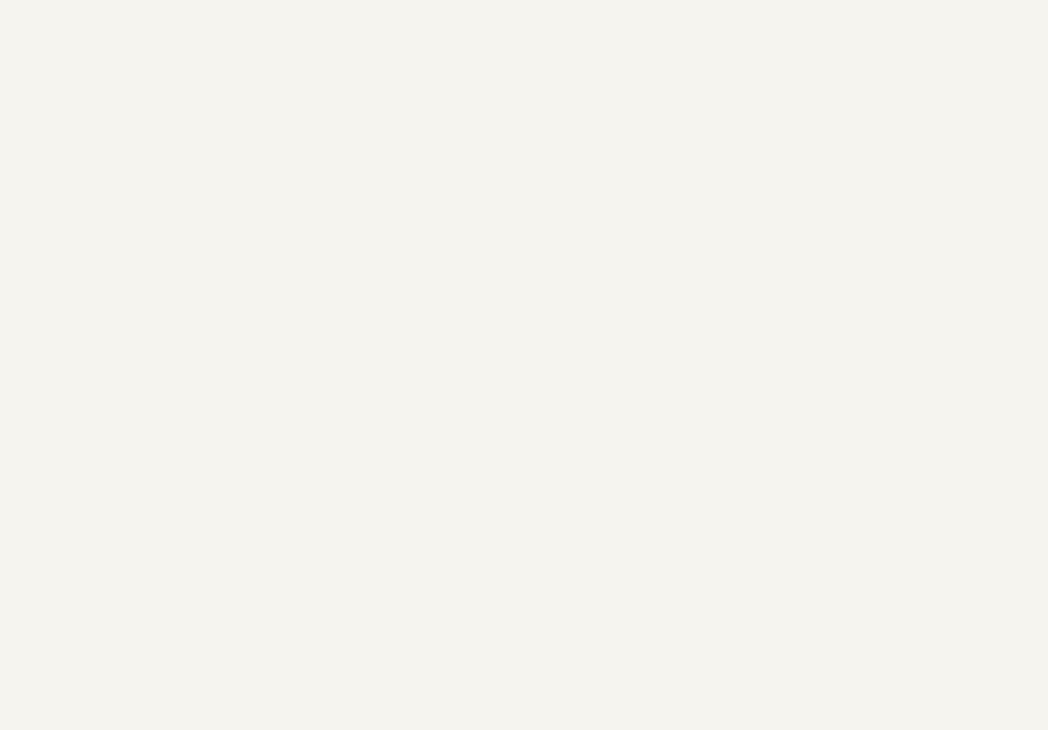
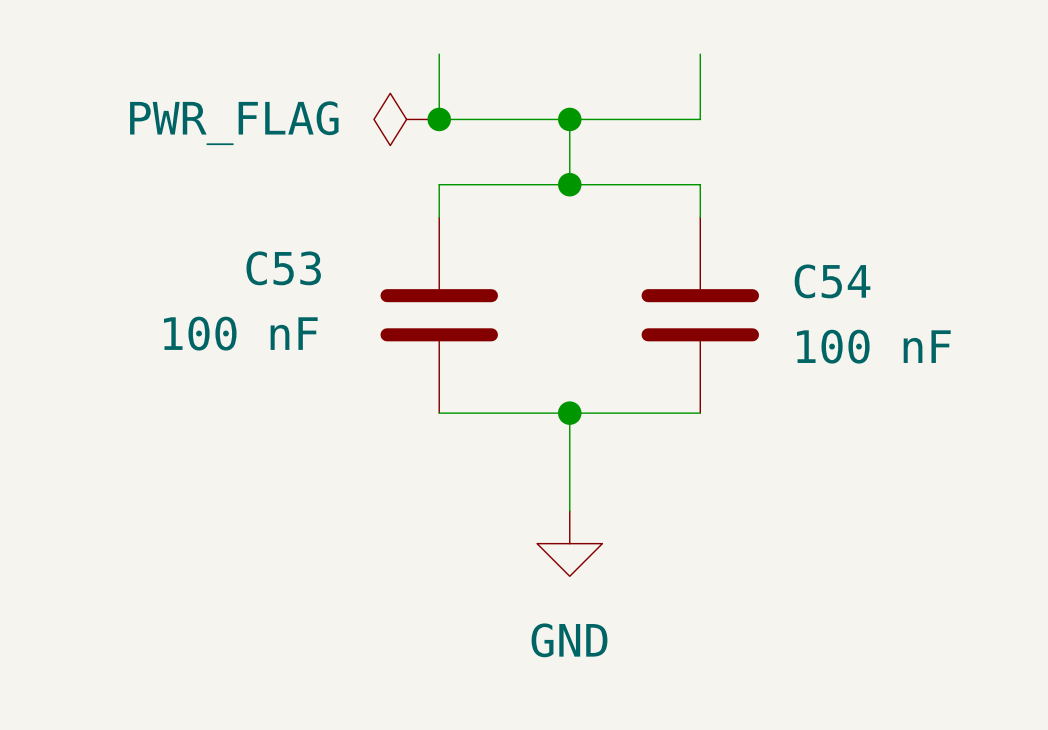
wire: none -> (439, 54) (439, 119) (700, 119) (700, 54)
power symbol: none -> PWR_FLAG (406, 119)
junction: none -> (439, 119)
wire: none -> (569, 119) (569, 184)
junction: none -> (569, 119)
junction: none -> (569, 184)
wire: none -> (439, 217) (439, 184) (700, 184) (700, 217)
C53: none -> 100 nF (439, 315)
C54: none -> 100 nF (700, 315)
wire: none -> (439, 413) (700, 413)
wire: none -> (569, 413) (569, 511)
junction: none -> (569, 413)
power symbol: none -> GND (569, 543)

